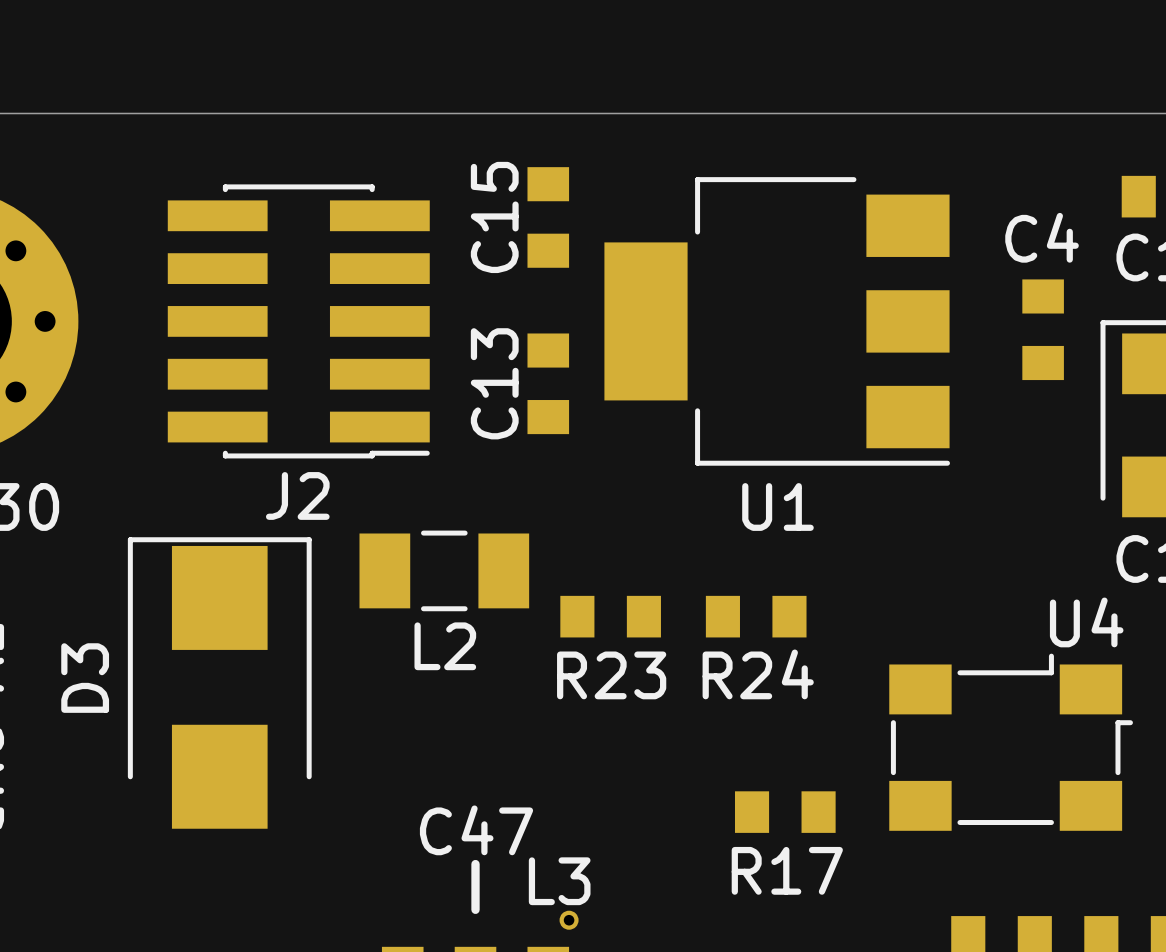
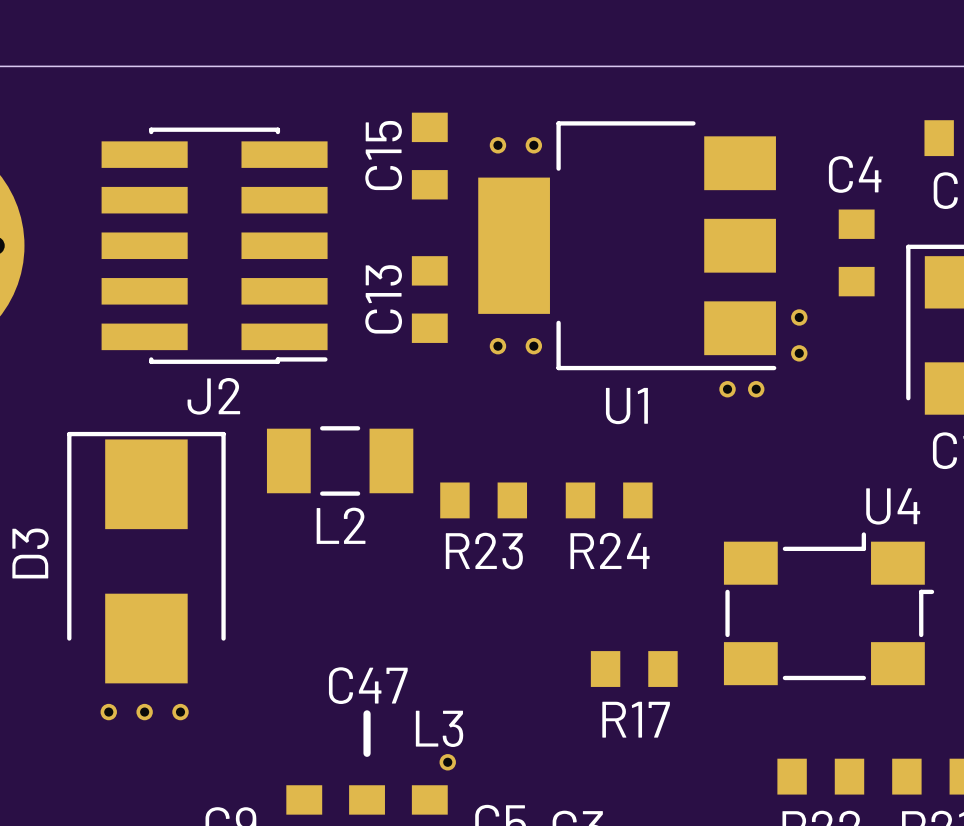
part: none -> (497, 145)
part: none -> (533, 145)
part: none -> (799, 317)
part: none -> (497, 346)
part: none -> (533, 346)
part: none -> (799, 353)
part: none -> (727, 389)
part: none -> (756, 389)
part: none -> (108, 712)
part: none -> (144, 712)
part: none -> (180, 712)

